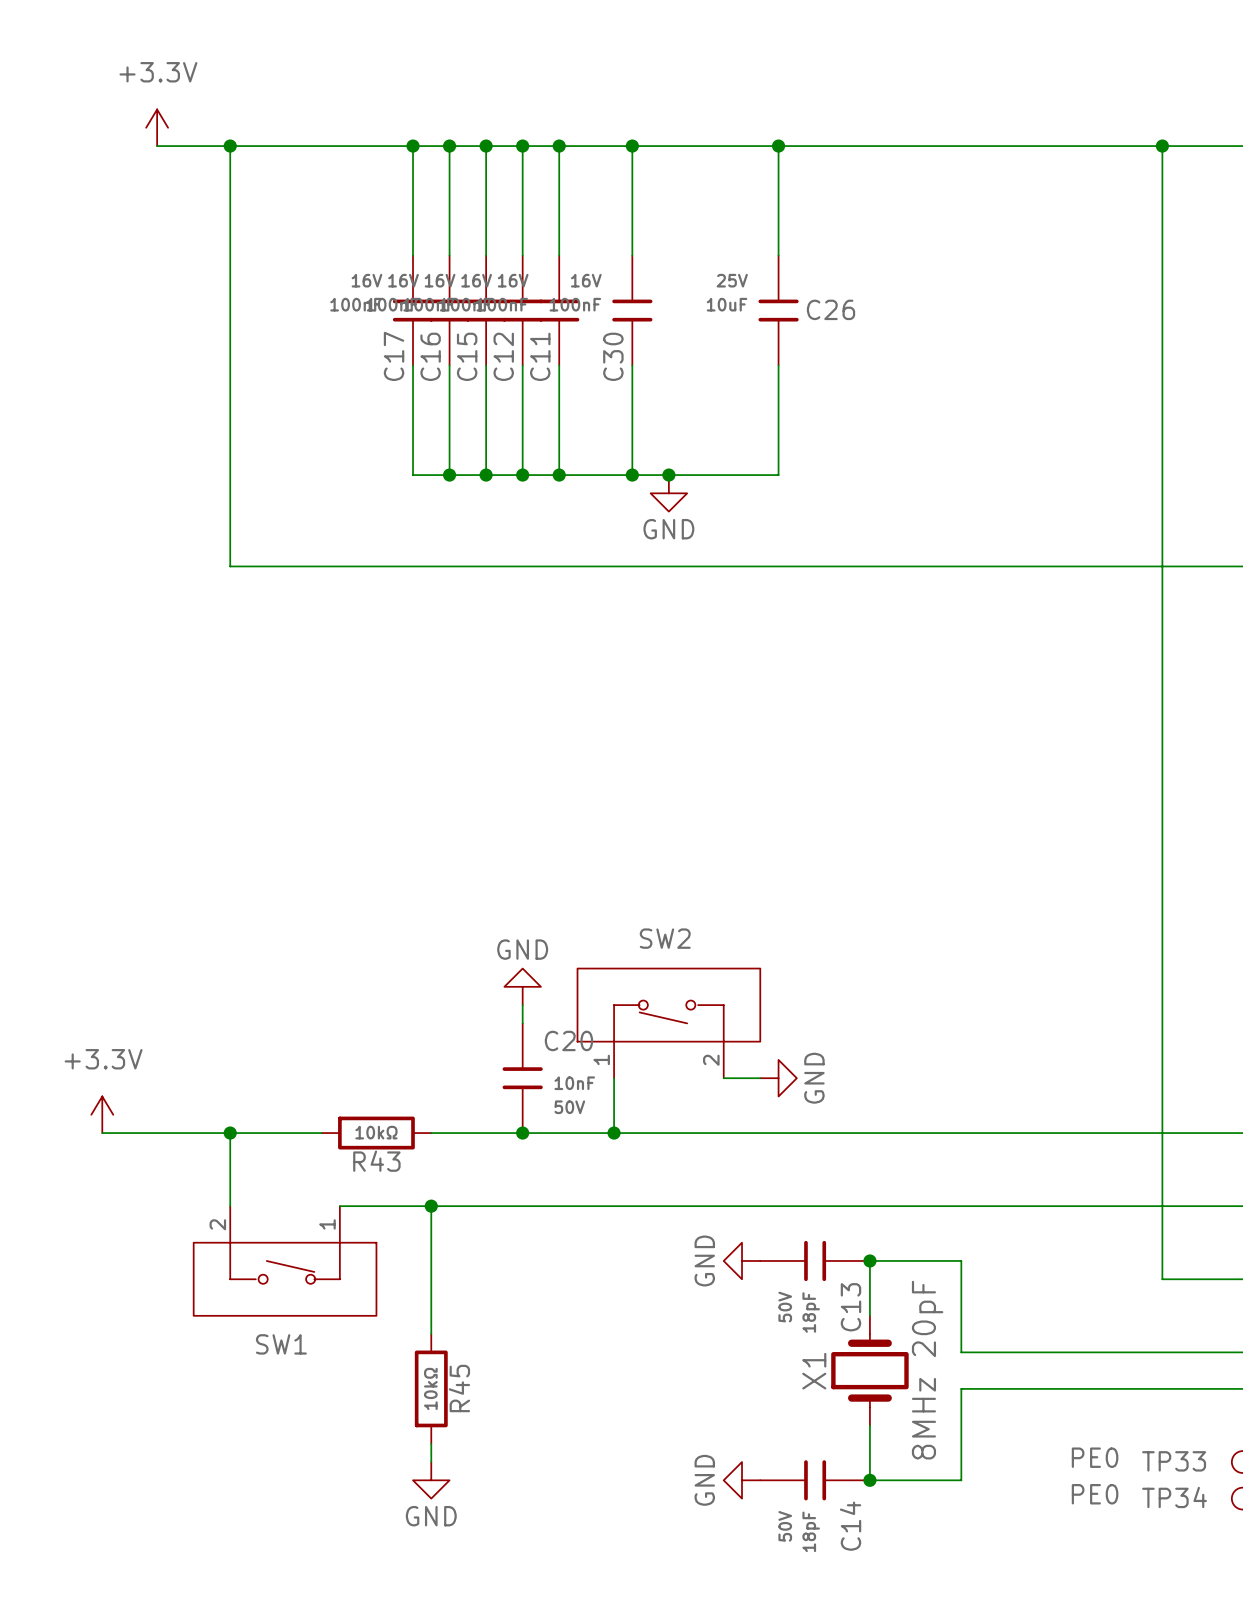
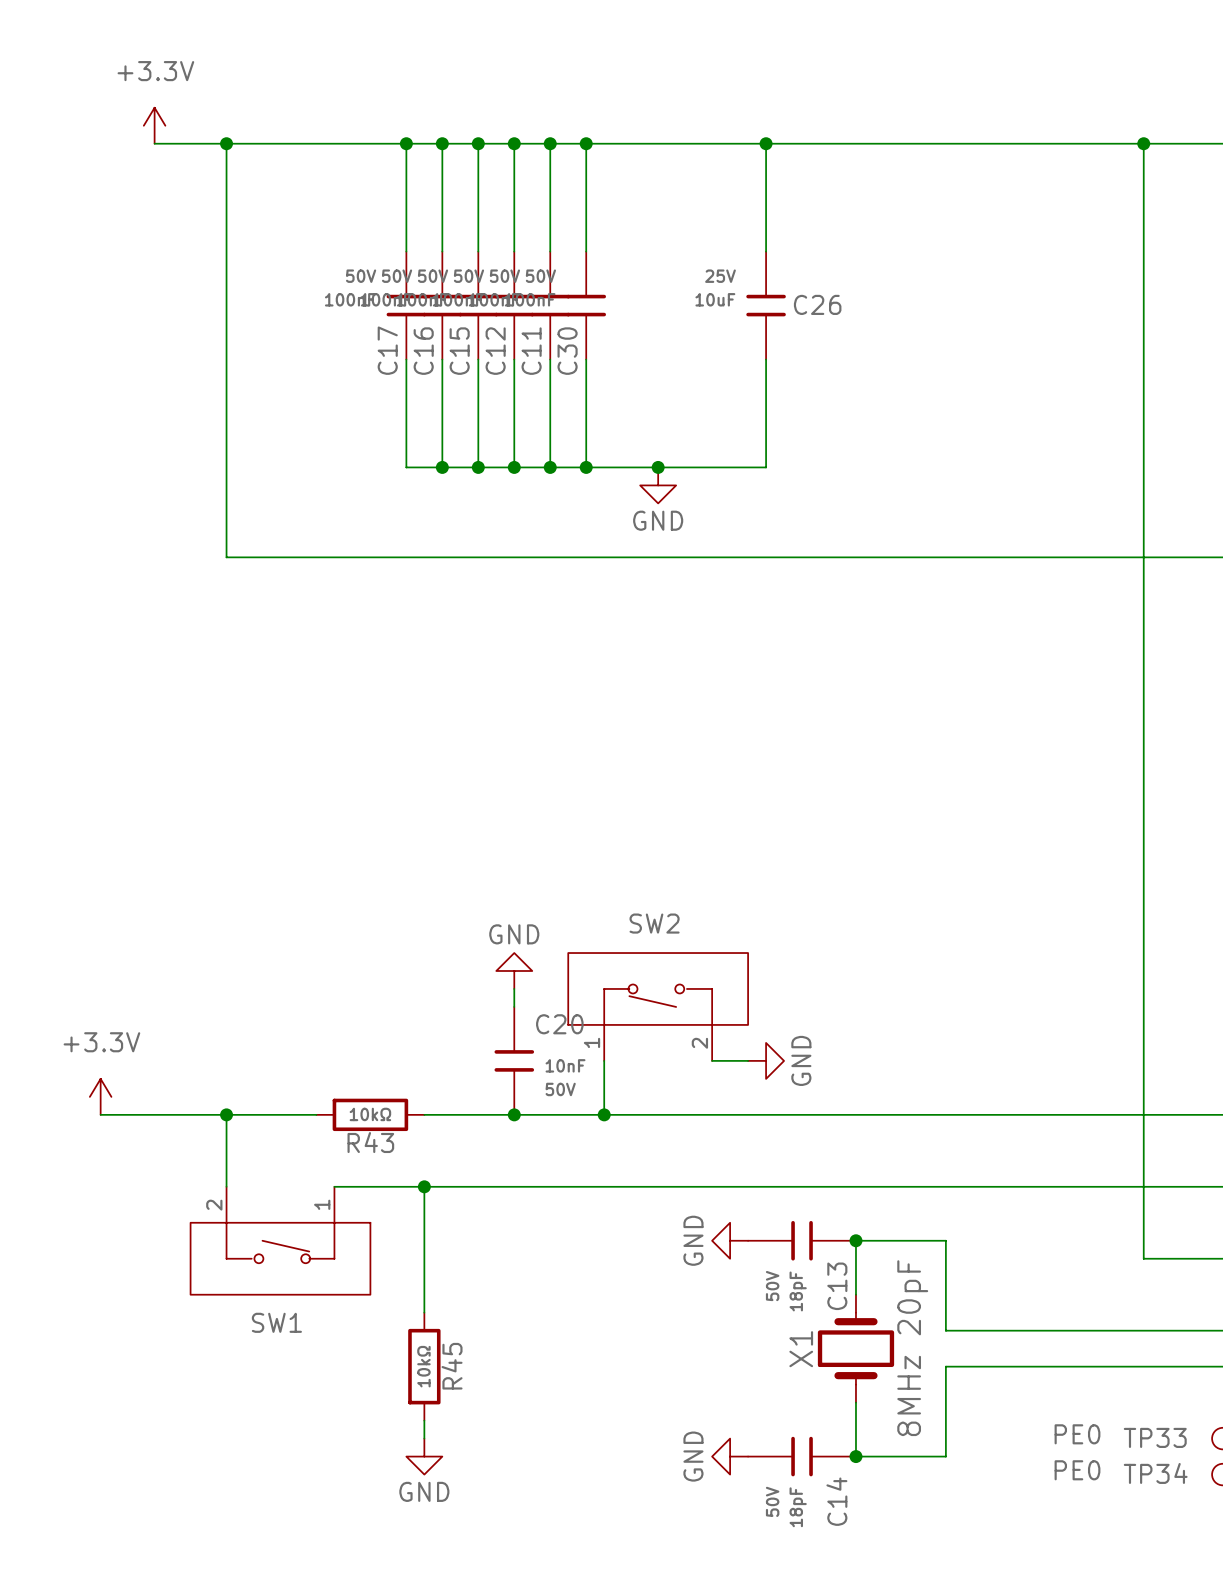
wire: (632, 146) (632, 255) -> (586, 143) (586, 251)
junction position: (632, 146) -> (586, 143)
C17 text: 16V (366, 280) -> 50V (361, 276)
C16 text: 16V (403, 280) -> 50V (397, 276)
C15 text: 16V (440, 280) -> 50V (433, 276)
C12 text: 16V (476, 280) -> 50V (468, 276)
C11 text: 16V (513, 280) -> 50V (504, 276)
C30 text: 16V (586, 280) -> 50V (540, 276)
C30 position: (632, 310) -> (586, 305)
wire: (632, 365) (632, 475) -> (586, 359) (586, 467)
junction position: (632, 475) -> (586, 467)

